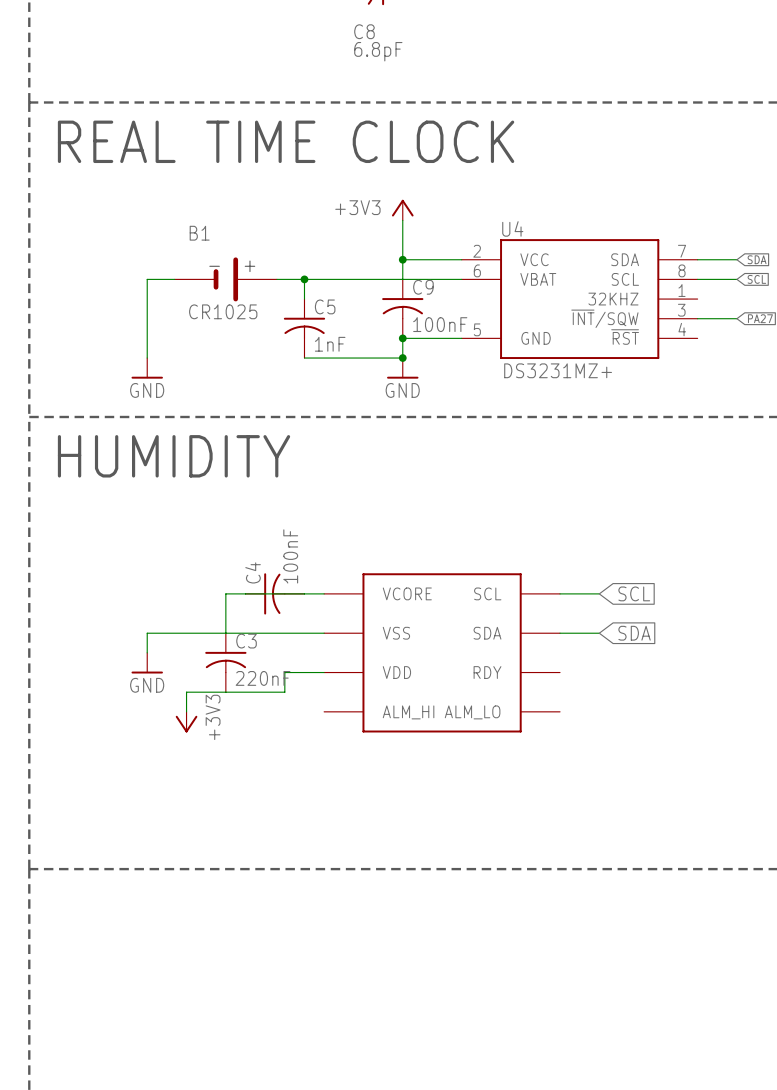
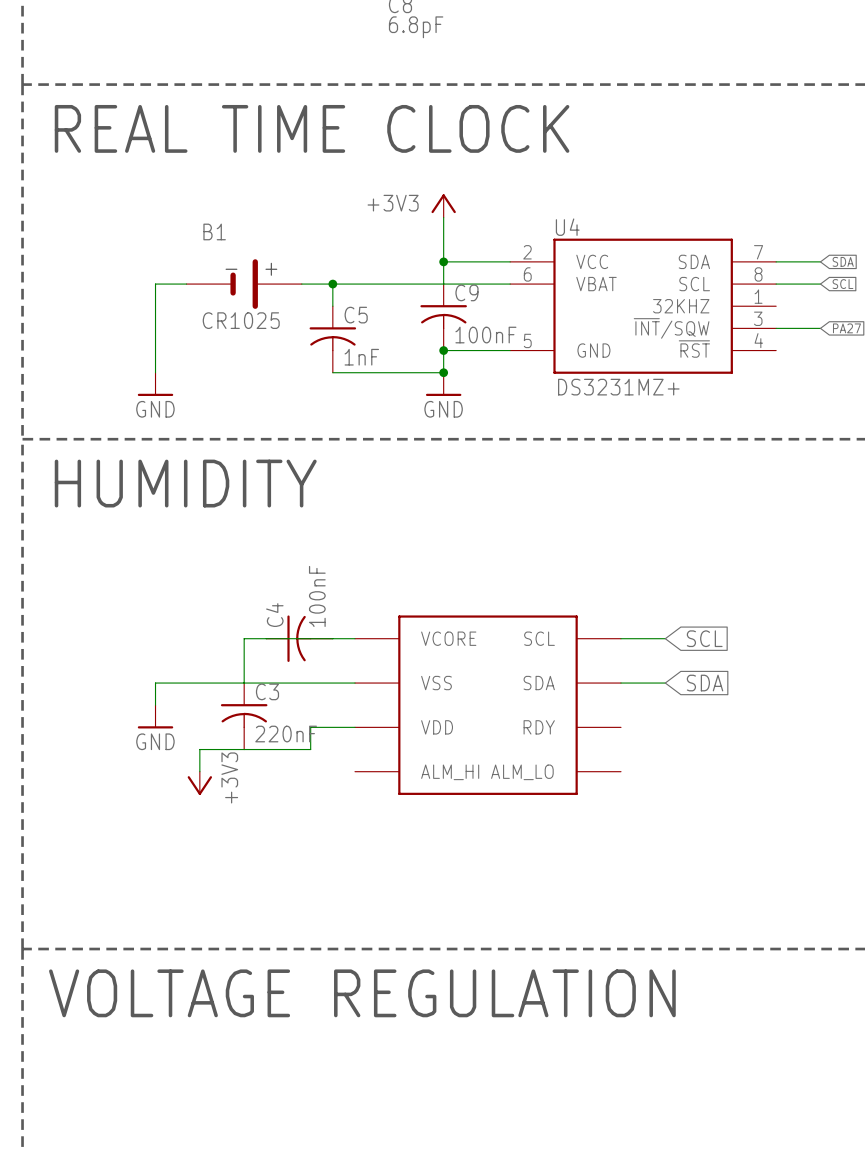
text: none -> VOLTAGE REGULATION (362, 993)

